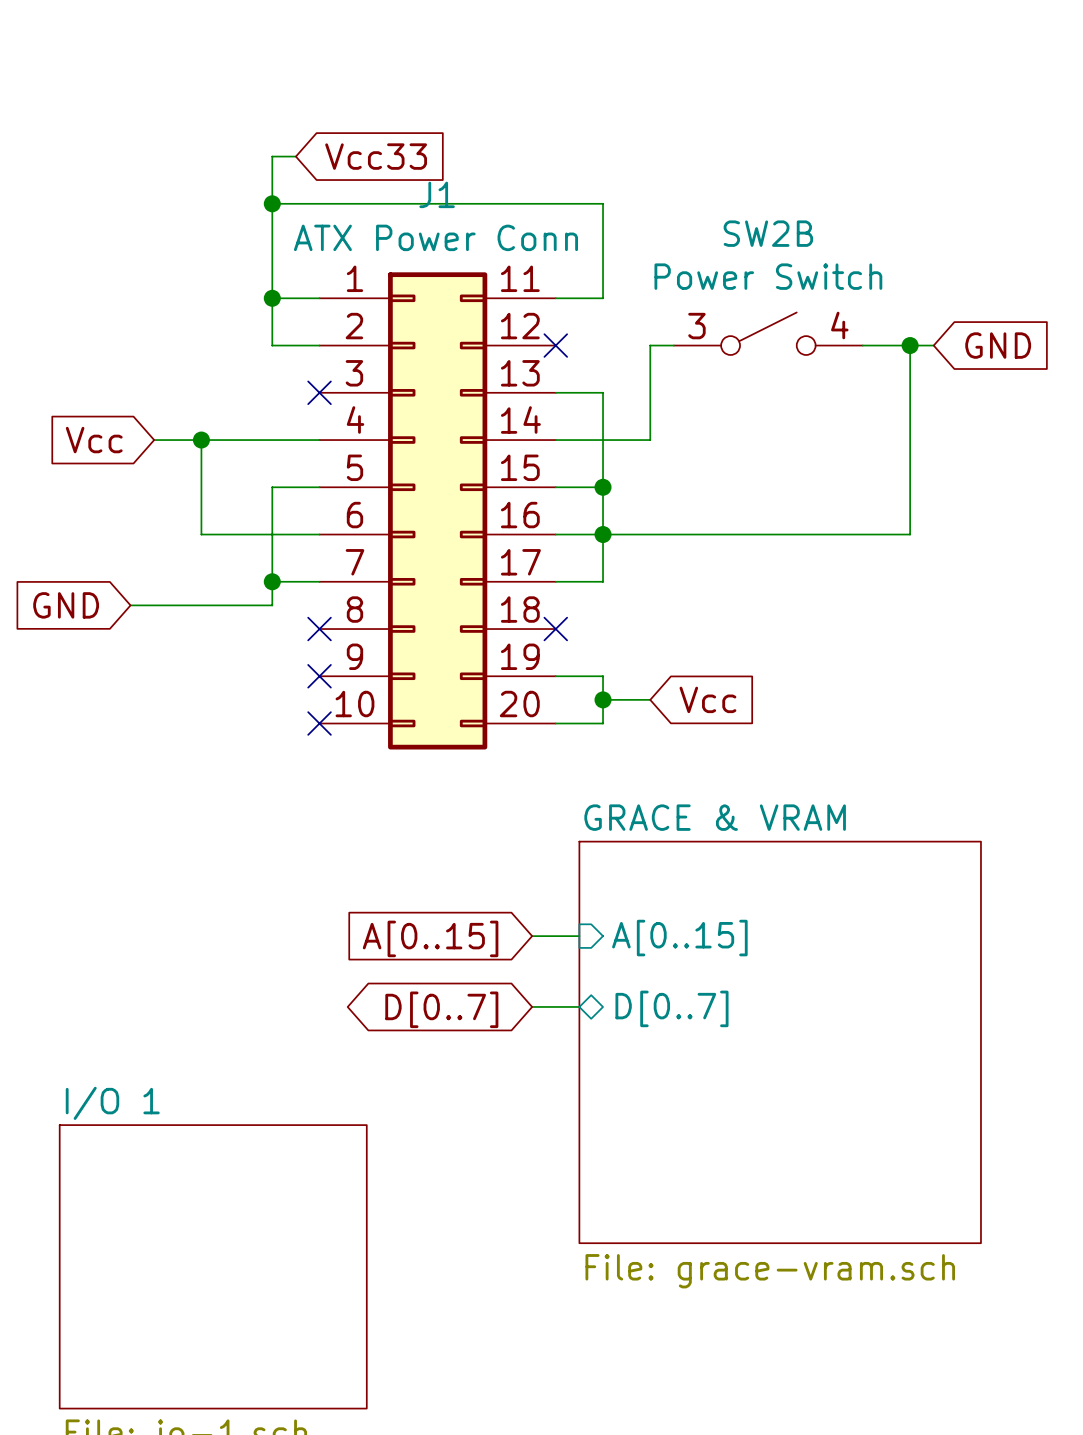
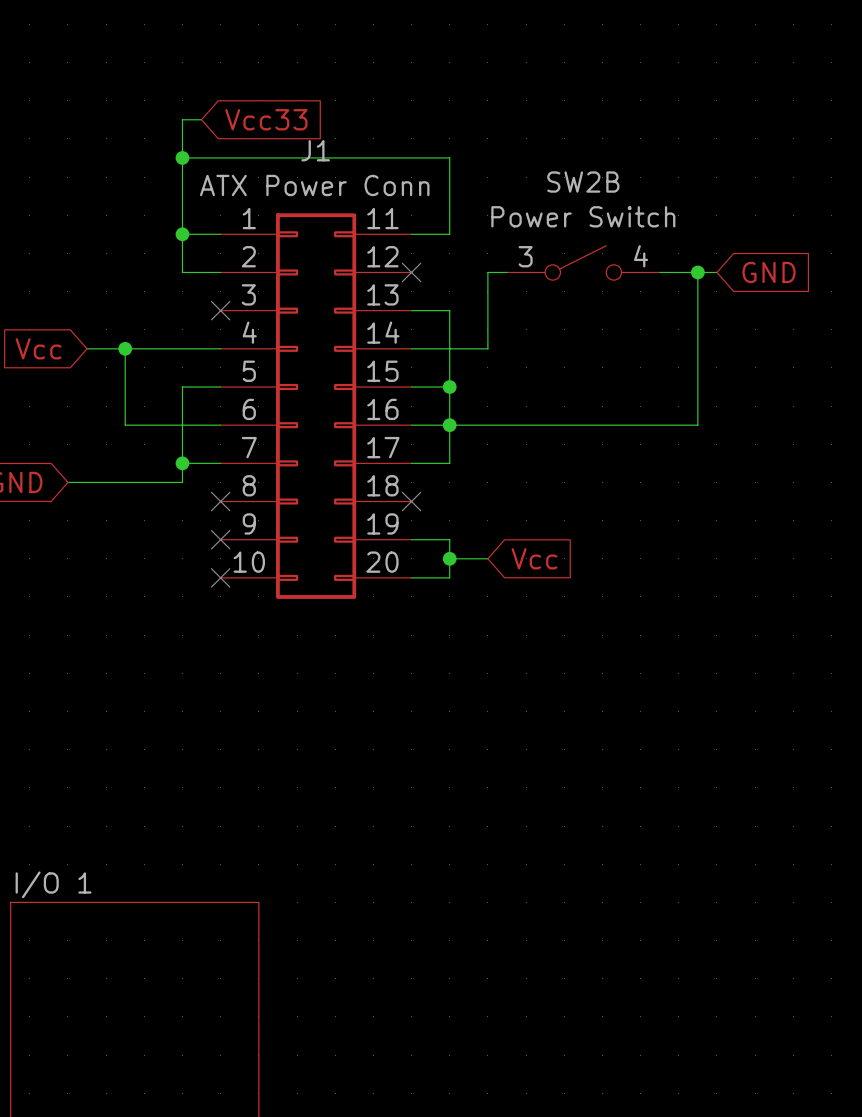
wire: (532, 936) (579, 936) -> none
global label: A[0..15] (430, 938) -> none
sheet pin: A[0..15] (679, 938) -> none
wire: (532, 1006) (579, 1006) -> none
sheet pin: D[0..7] (672, 1008) -> none
global label: D[0..7] (441, 1009) -> none
sheet GRACE & VRAM: File: grace-vram.sch (780, 1042) -> none

